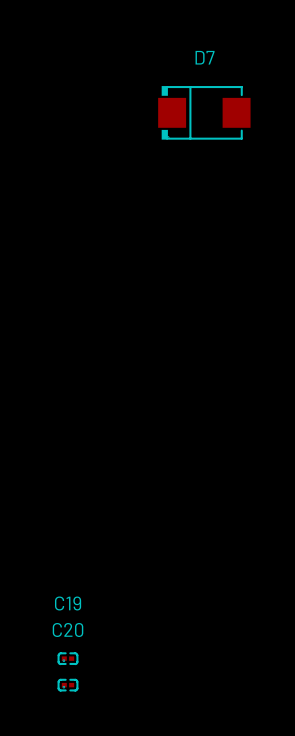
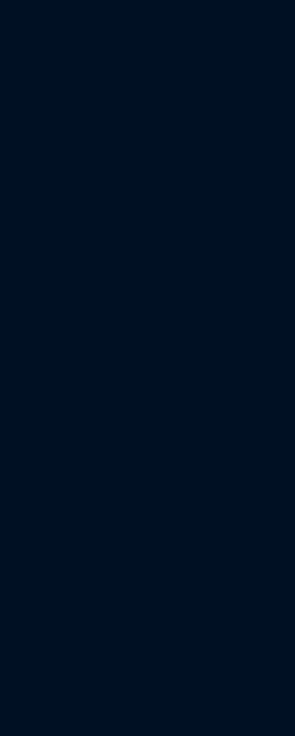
D7: (204, 112) -> none
C19: (67, 658) -> none
C20: (67, 685) -> none

